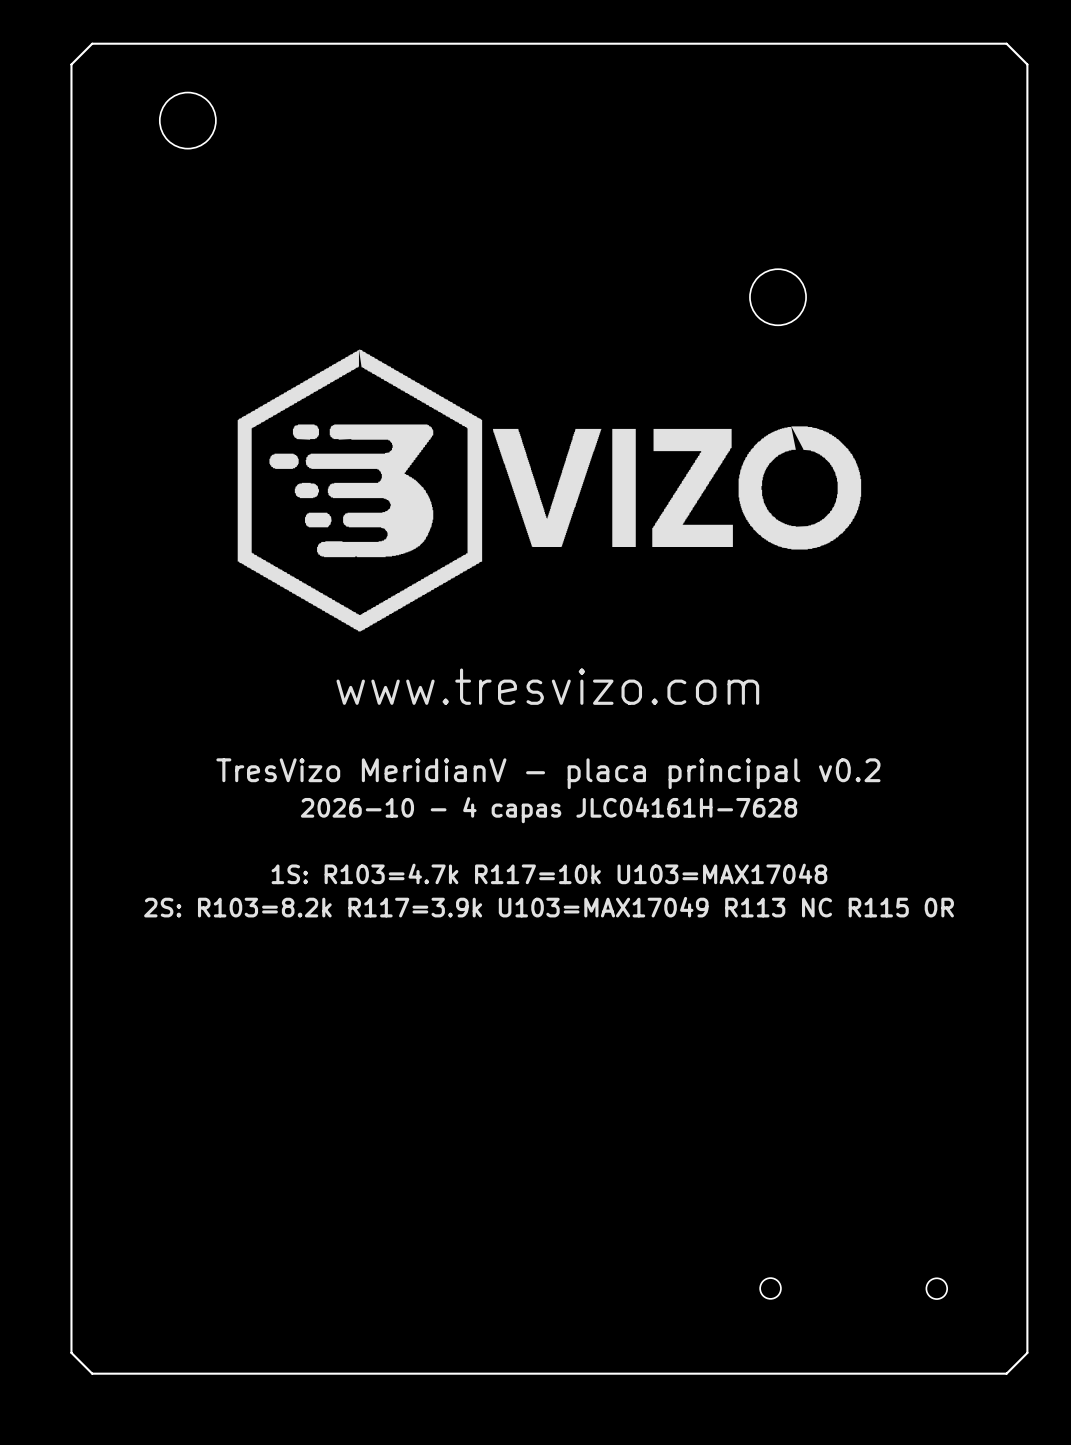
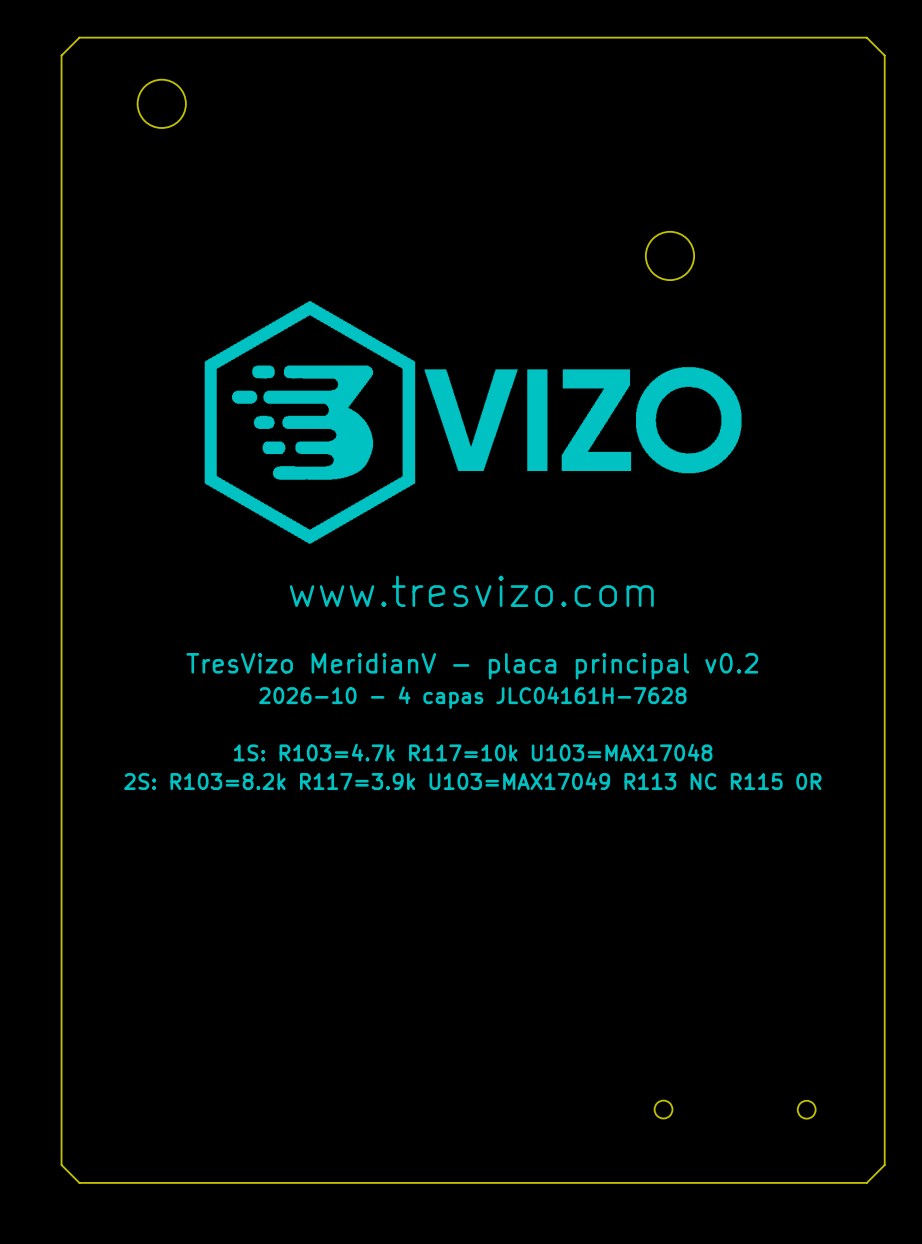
drawing: [237, 349, 483, 632] -> none
drawing: none -> [204, 301, 416, 544]
drawing: [738, 426, 862, 550] -> none
drawing: none -> [636, 367, 742, 474]

